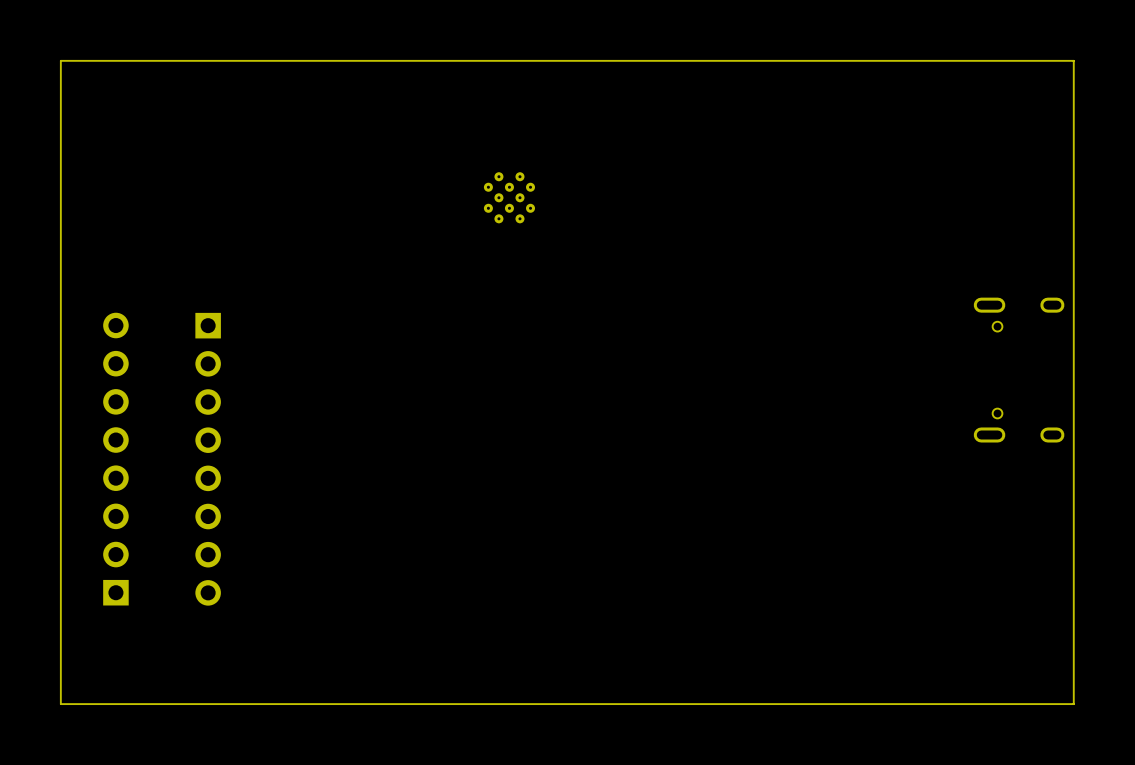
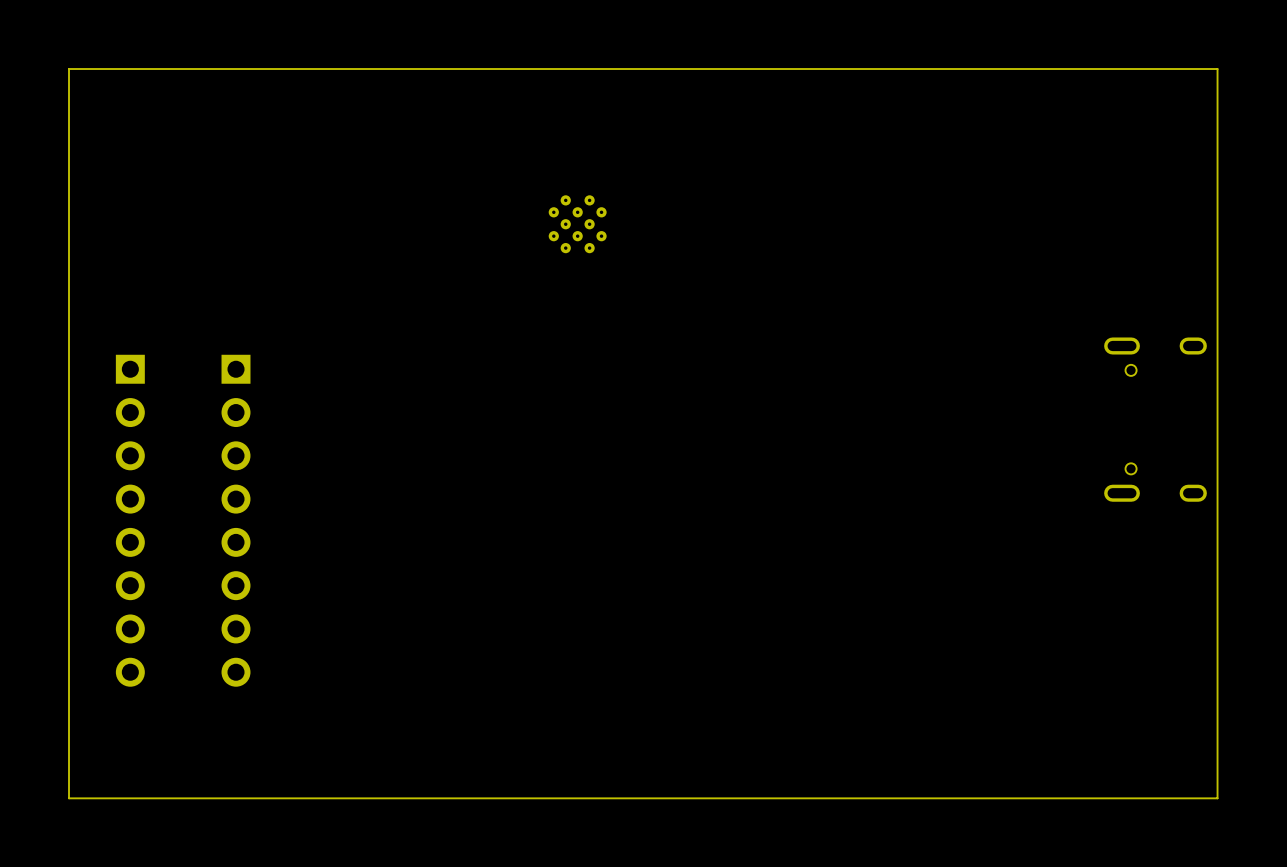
part rotation: 0° (115, 459) -> 180° (130, 520)

